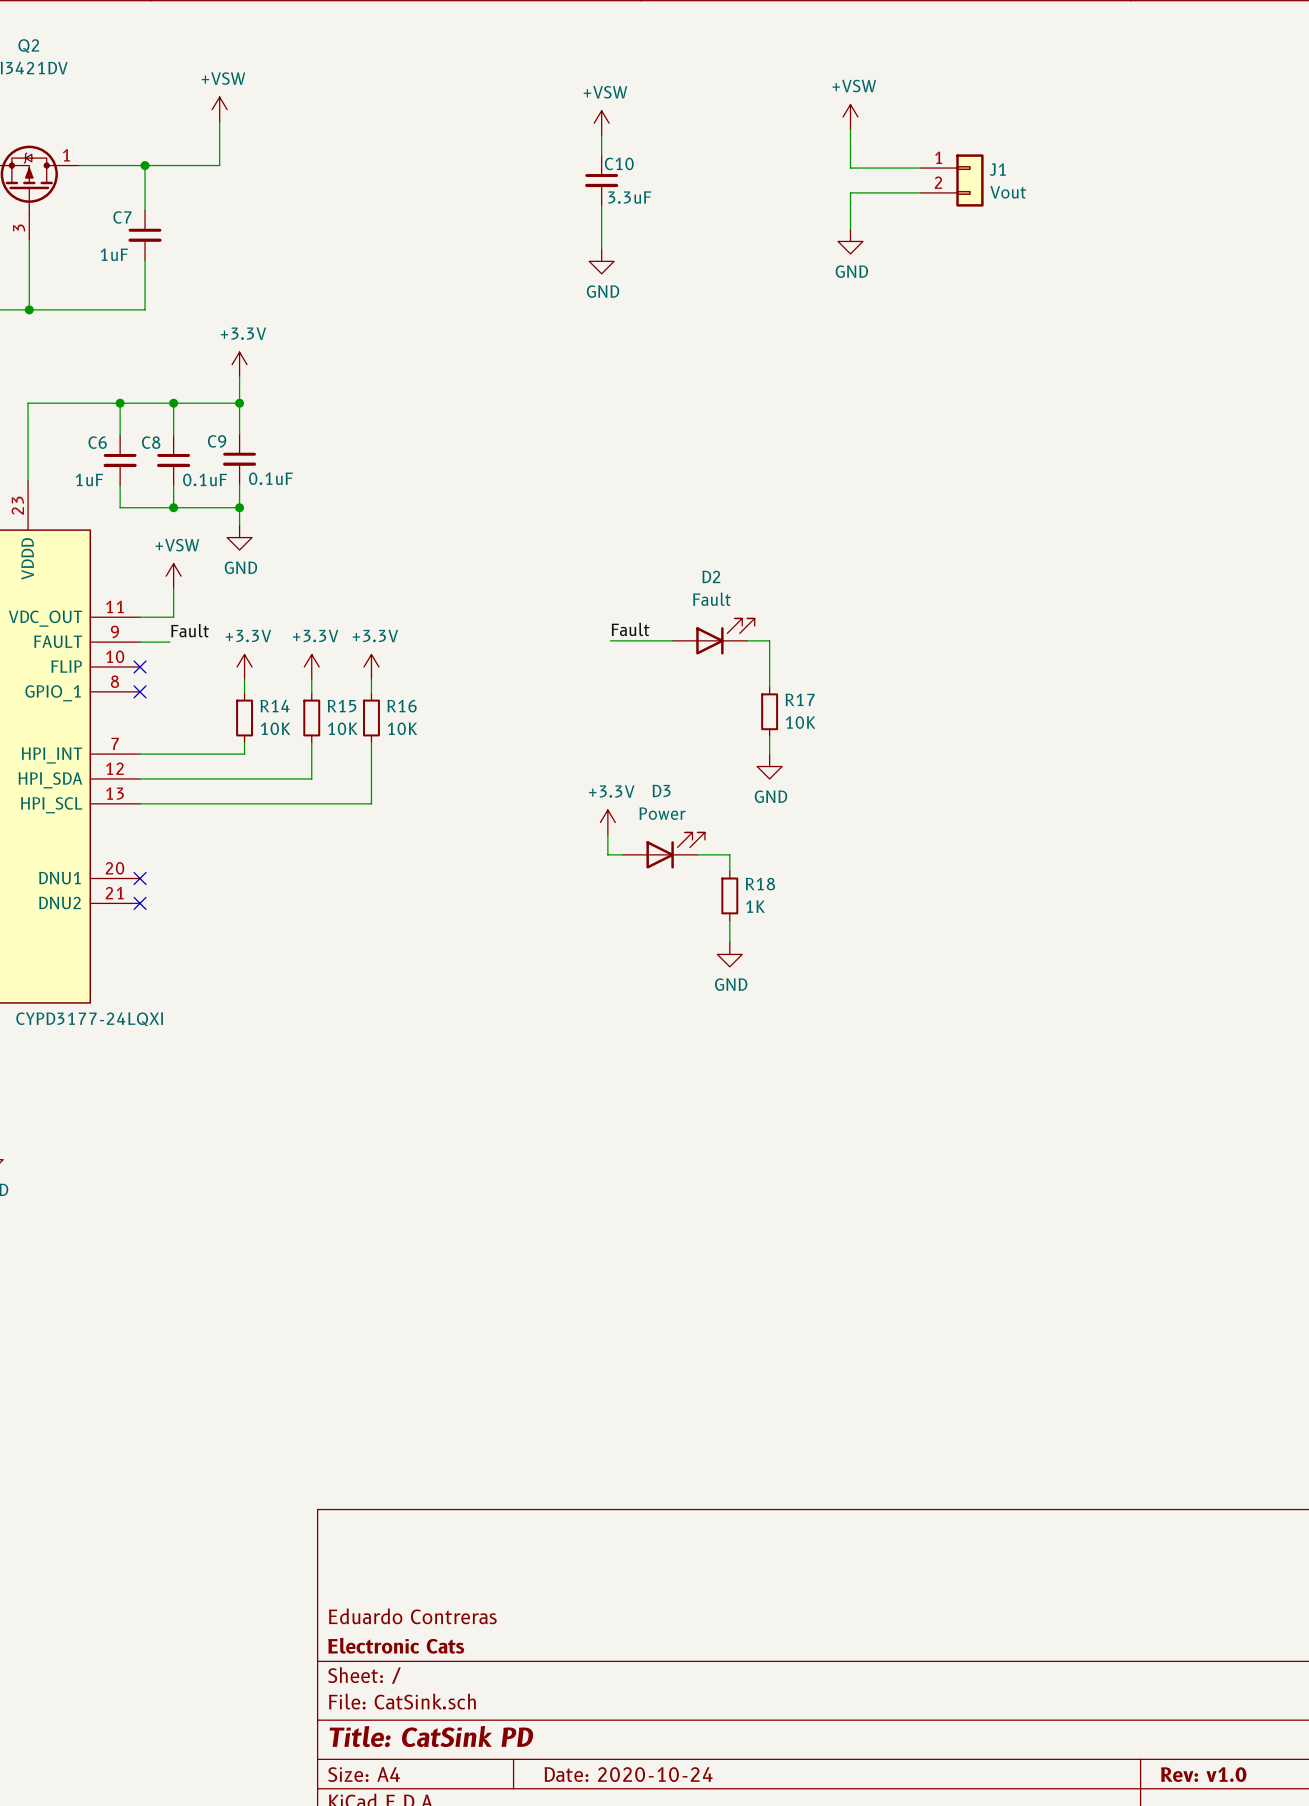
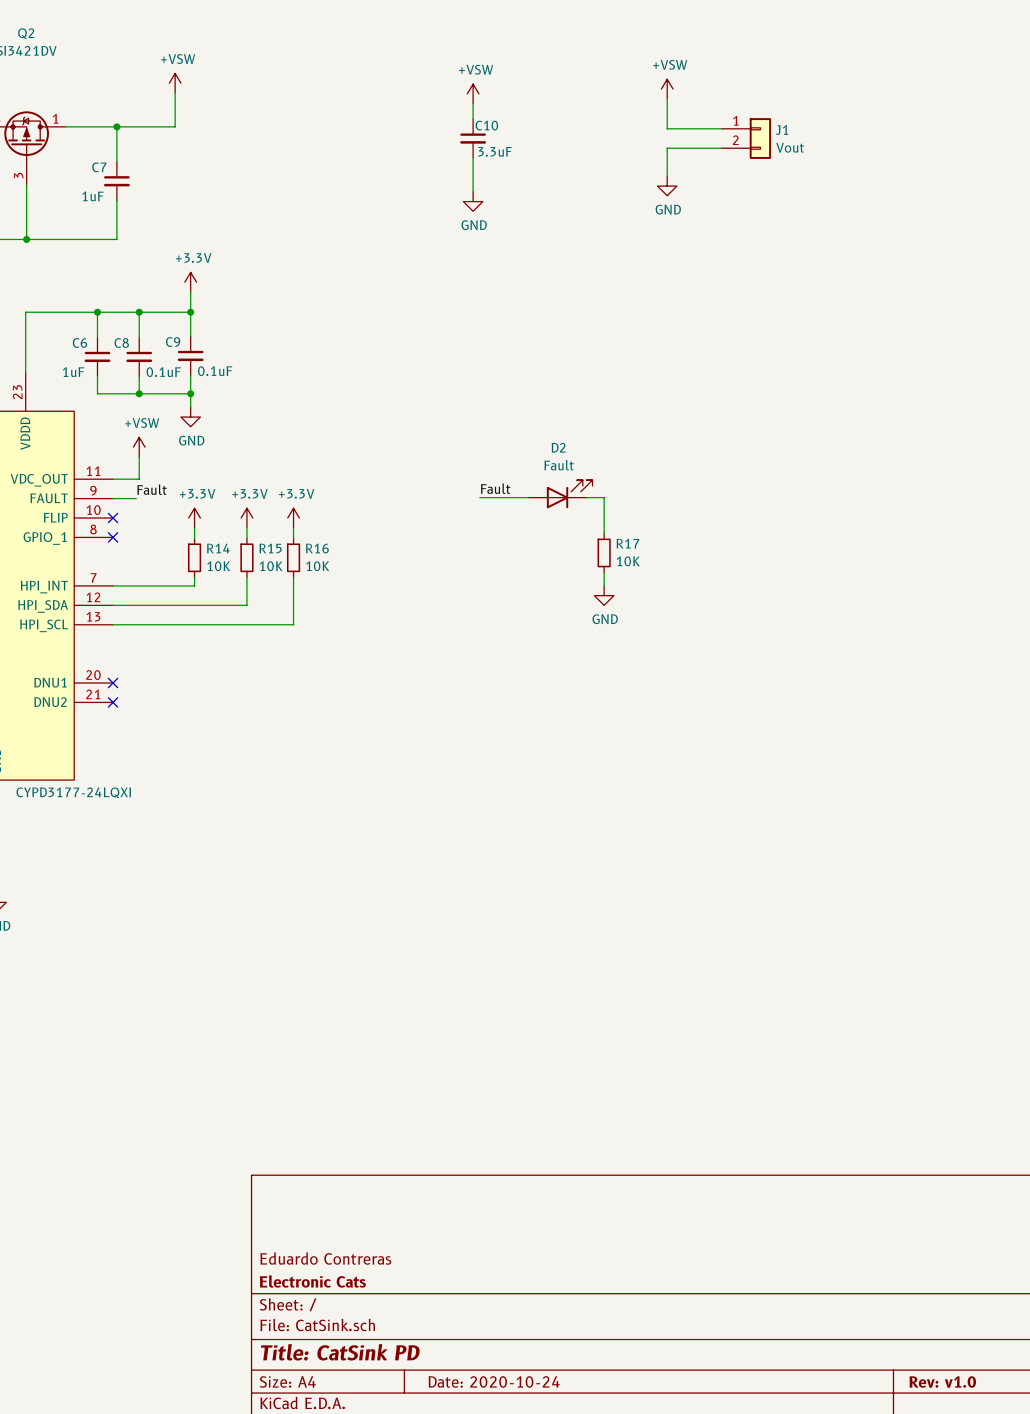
power symbol: +3.3V (607, 822) -> none
wire: (607, 834) (607, 854) (622, 854) -> none
D3: Power (663, 850) -> none
wire: (697, 854) (729, 854) (729, 871) -> none
R18: 1K (729, 895) -> none
wire: (729, 920) (729, 941) -> none
power symbol: GND (729, 954) -> none

